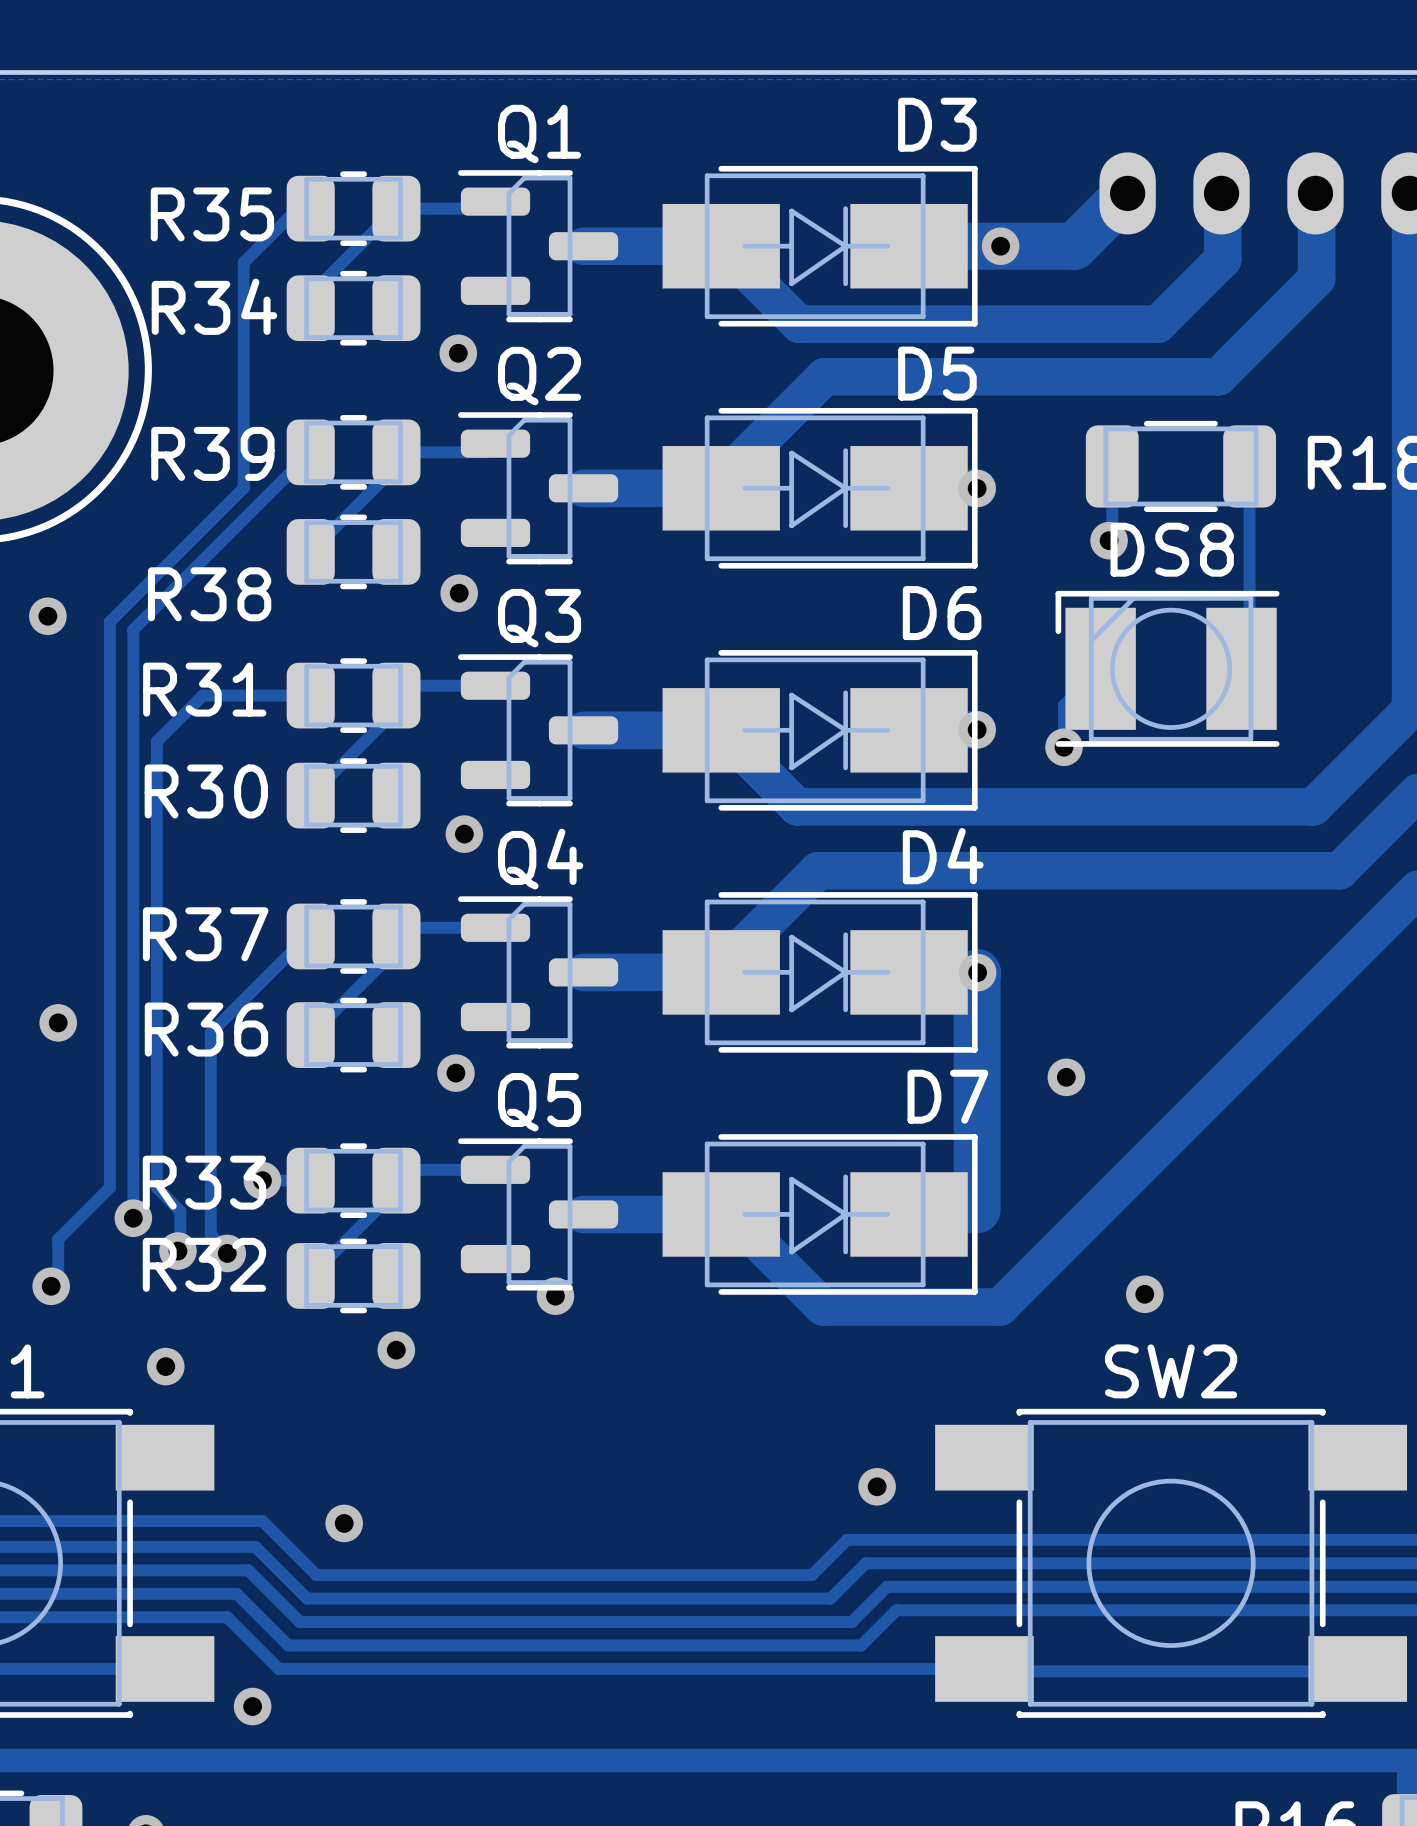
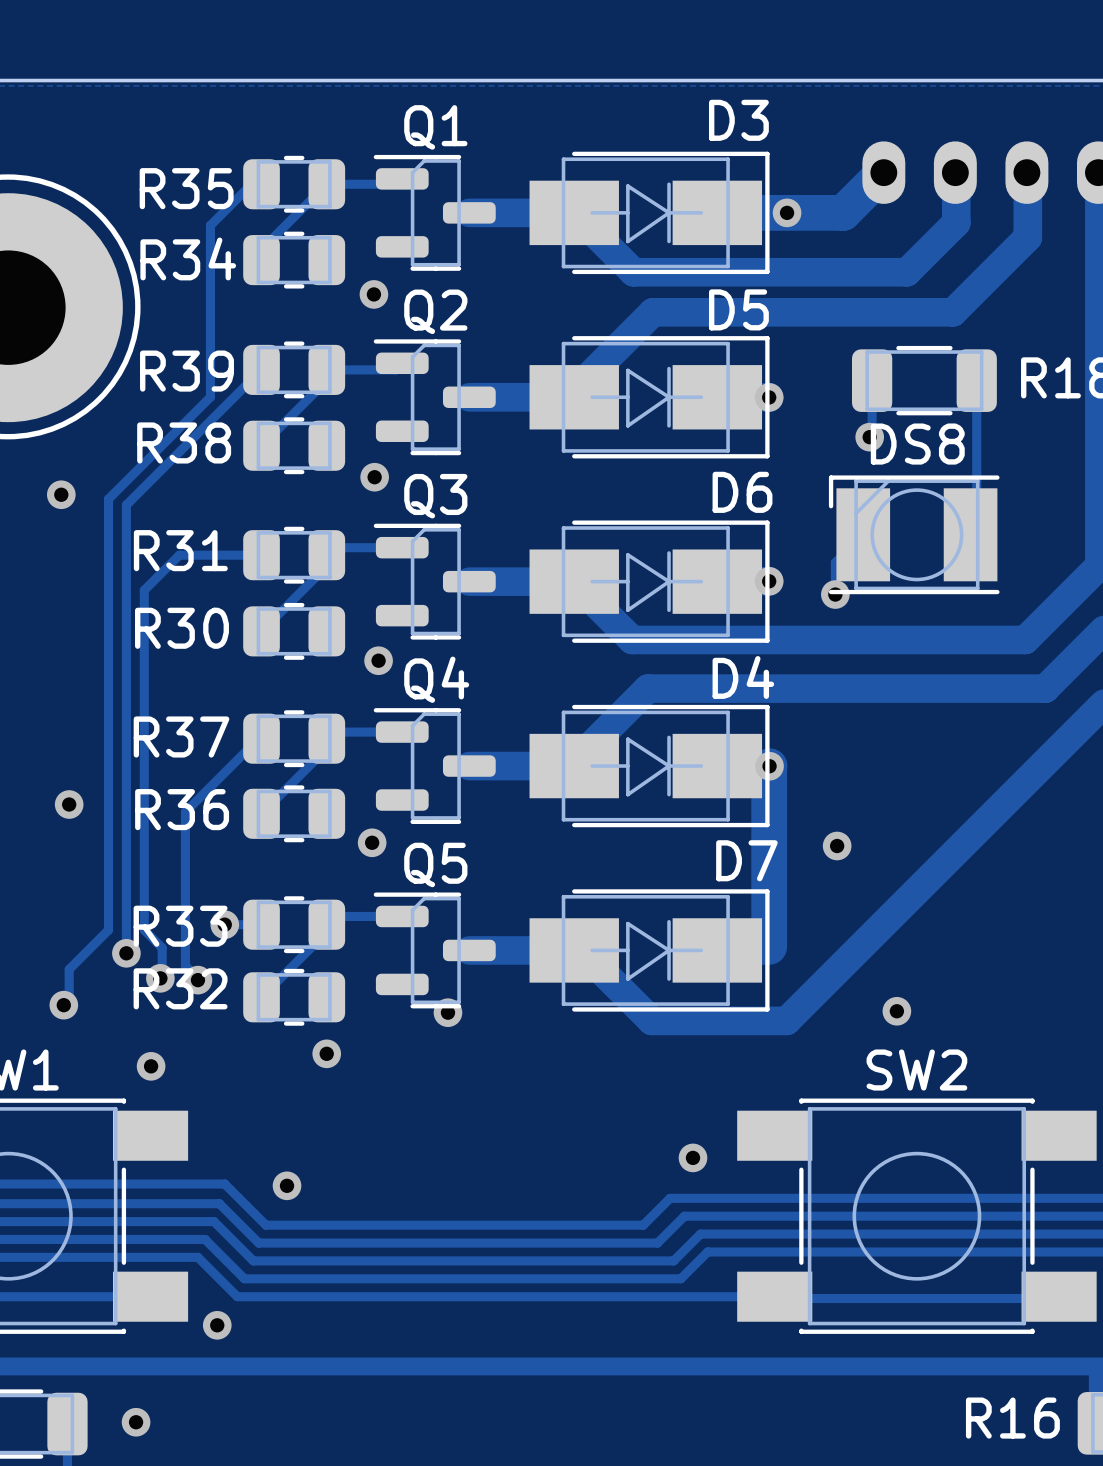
R38 name position: R38 (209, 594) -> R38 (184, 442)

